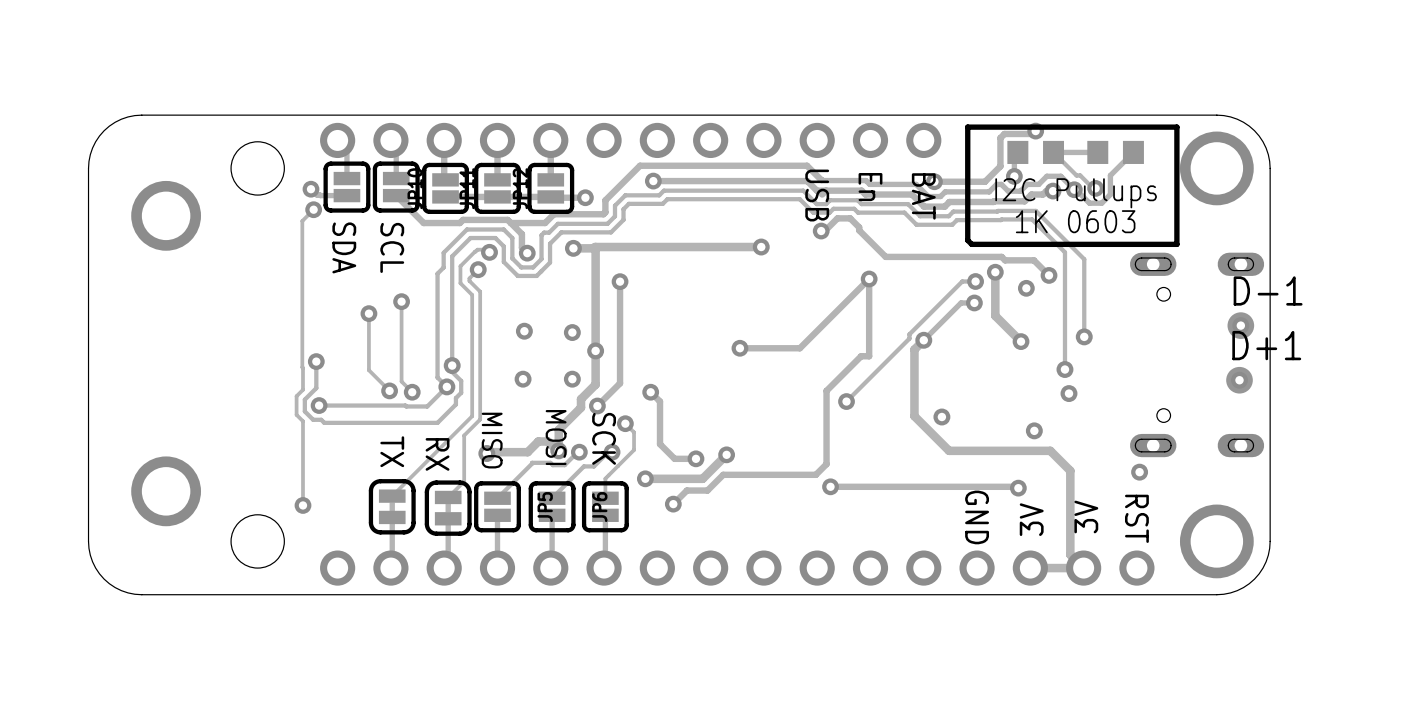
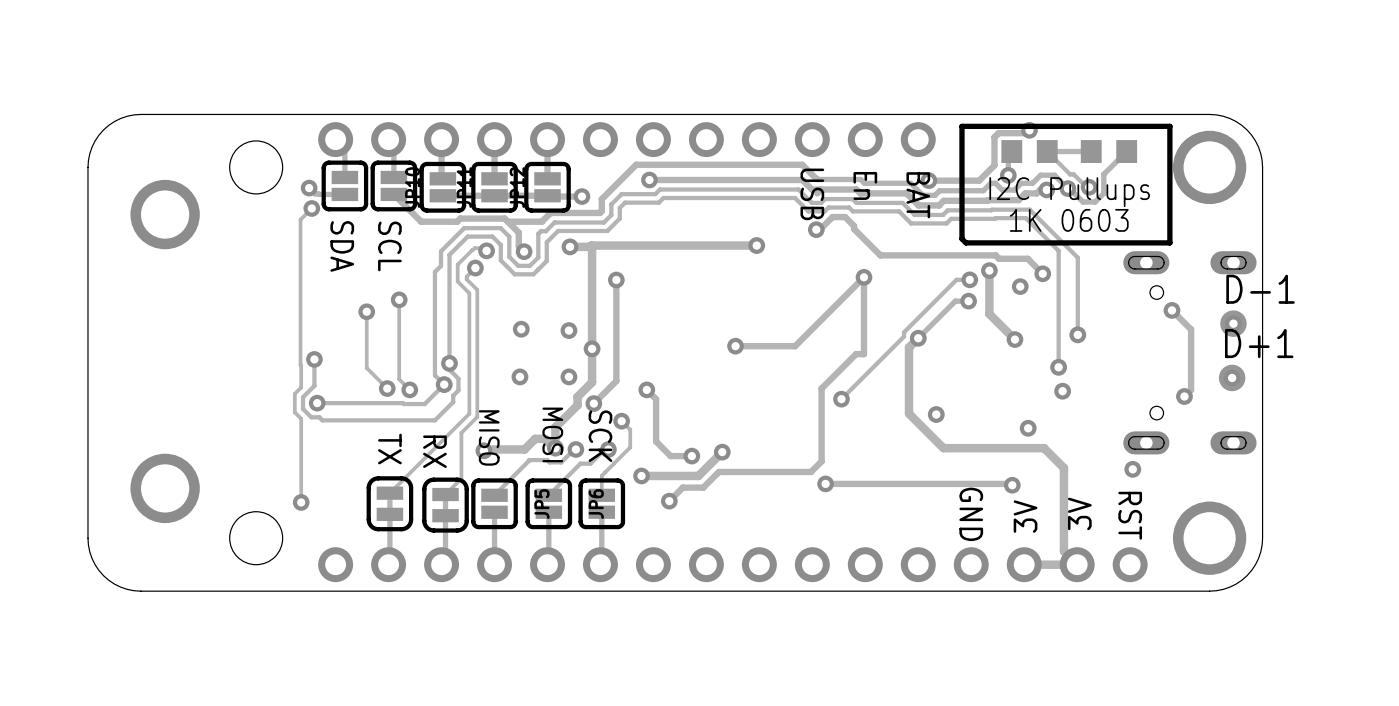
track: none -> (1171, 310) (1191, 329) (1191, 389) (1184, 396)
via: none -> (1171, 310)
via: none -> (1184, 396)

